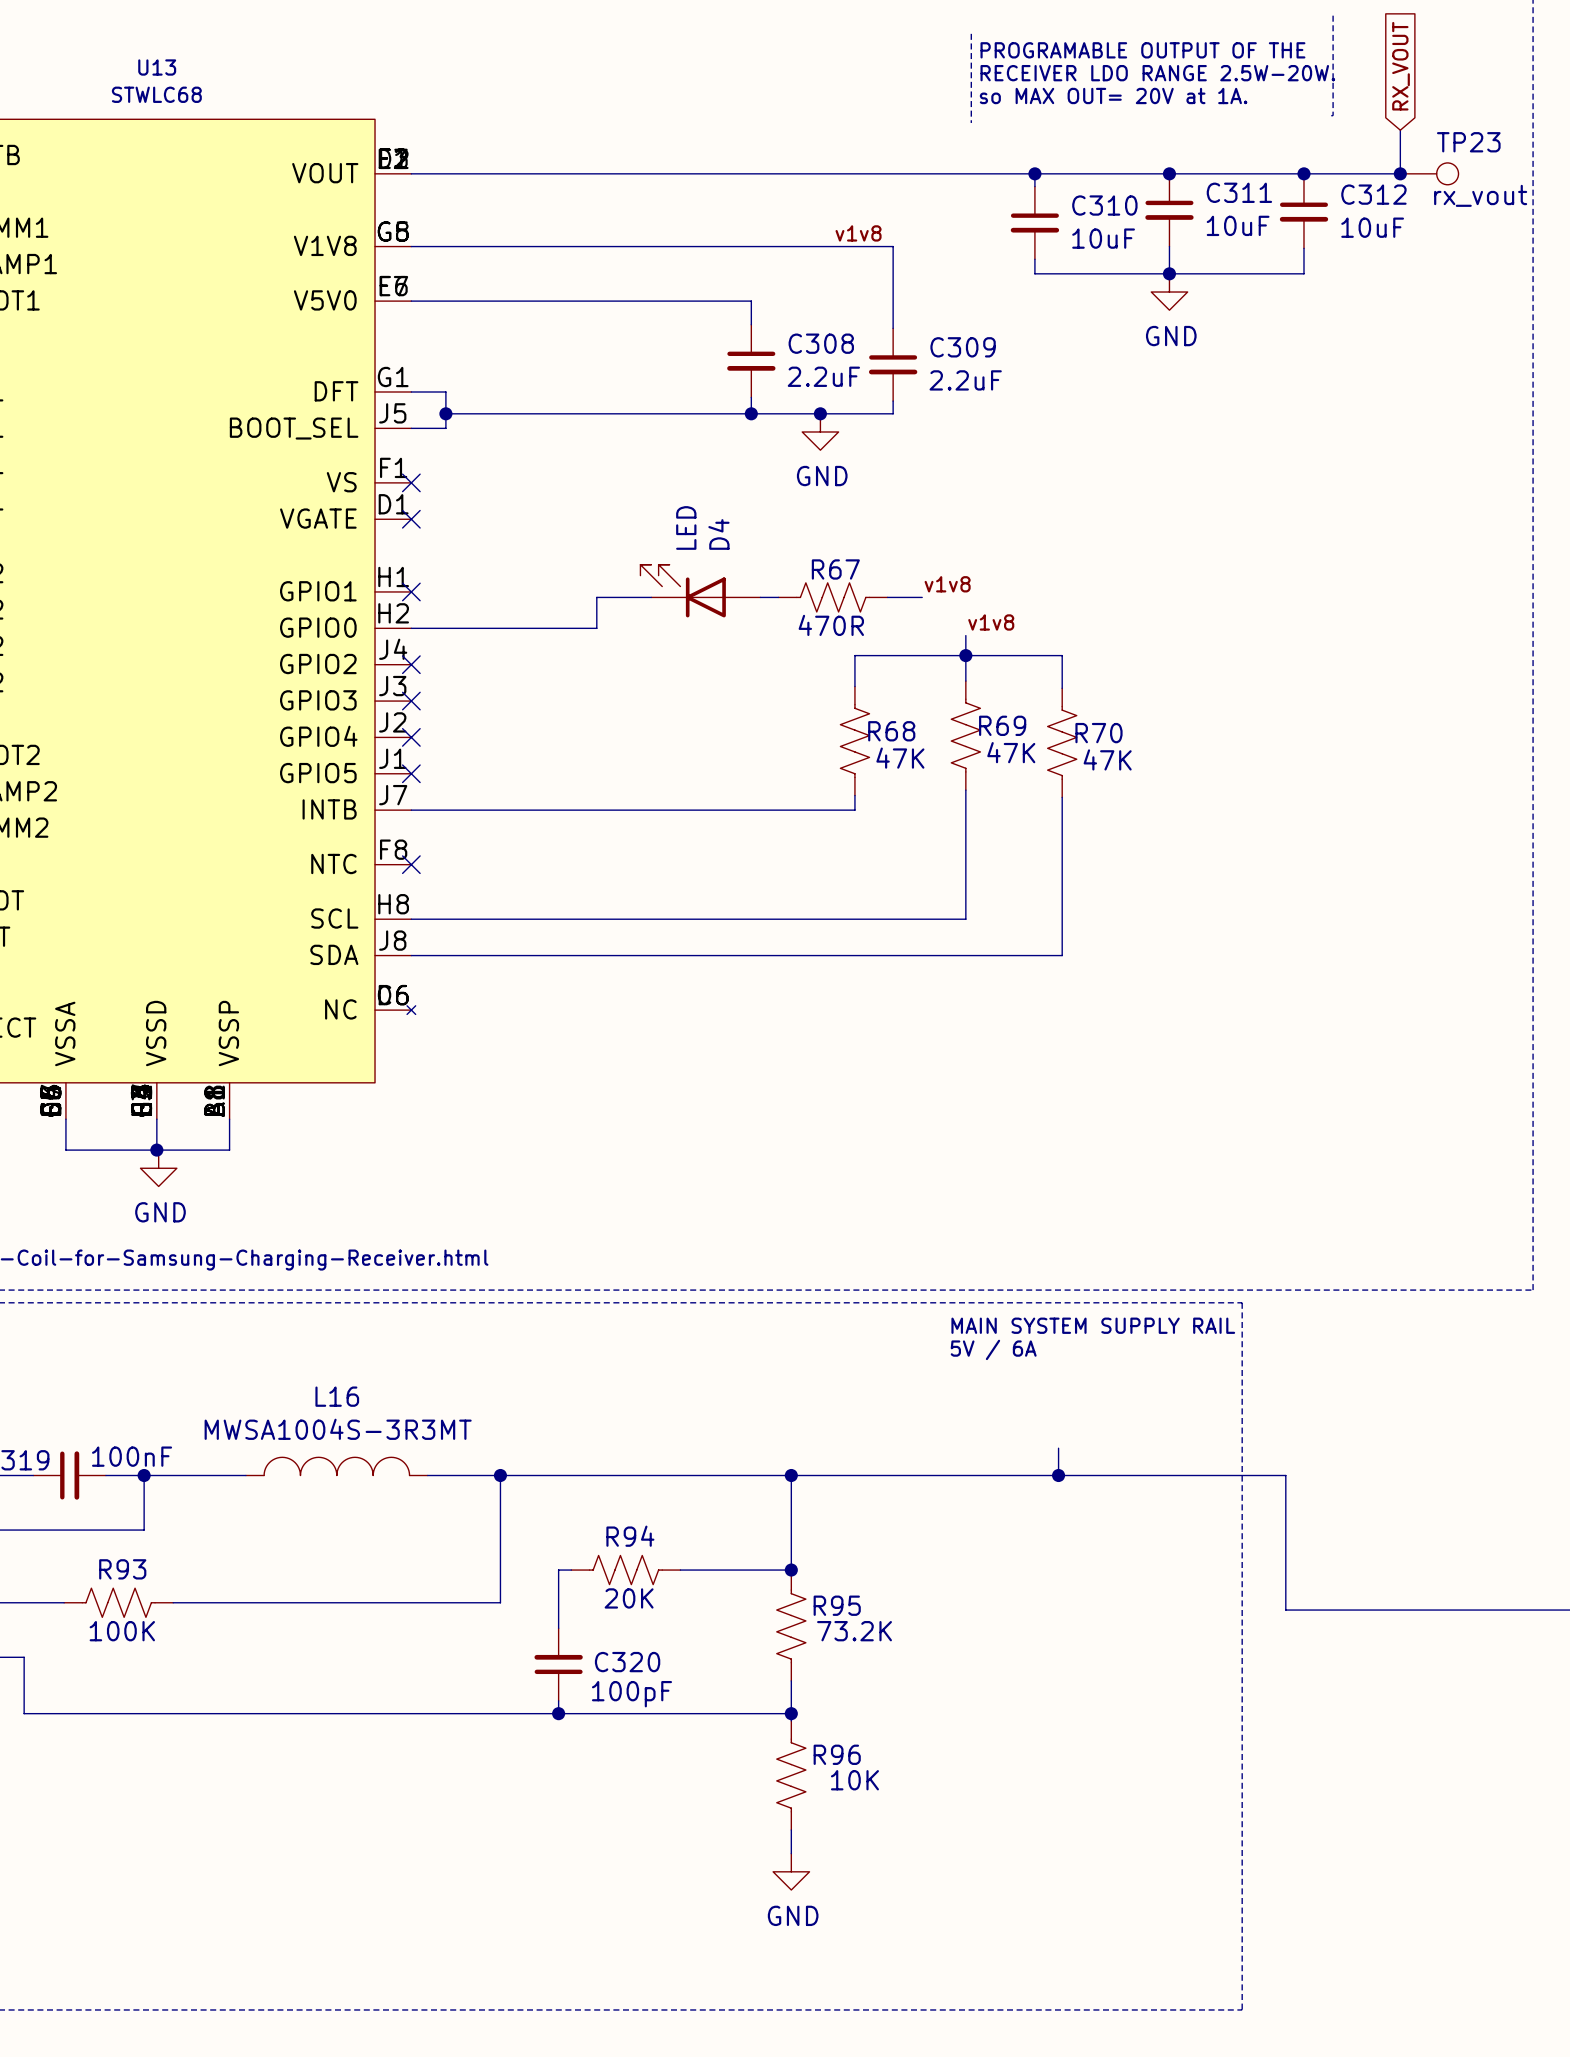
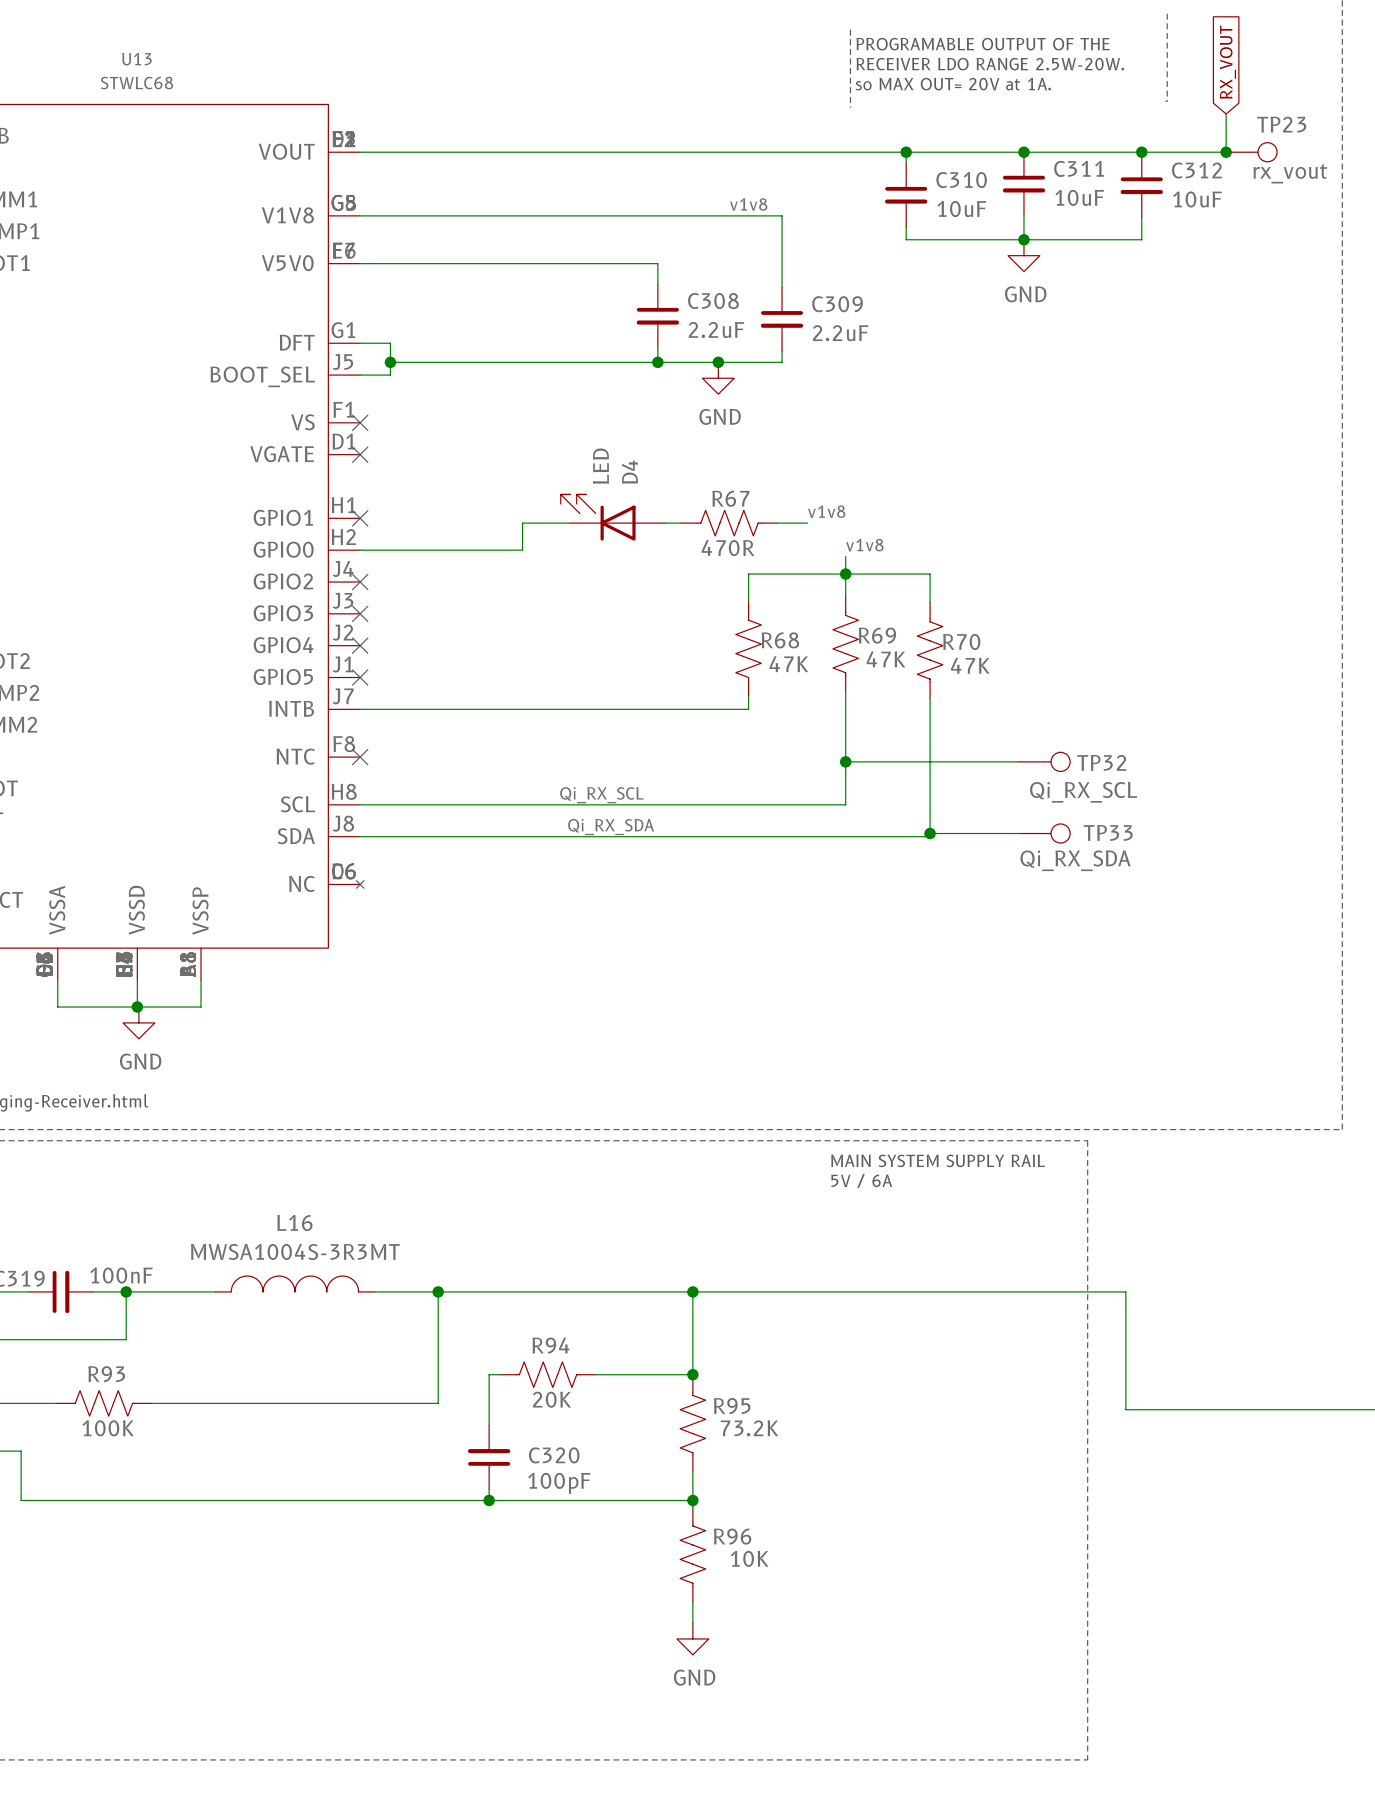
wire: none -> (845, 761) (1019, 761)
junction: none -> (845, 761)
TP32: none -> Qi_RX_SCL (1044, 761)
label: none -> Qi_RX_SCL (601, 795)
label: none -> Qi_RX_SDA (611, 827)
wire: none -> (930, 833) (1019, 833)
junction: none -> (930, 833)
TP33: none -> Qi_RX_SDA (1044, 833)
wire: (1058, 1448) (1058, 1475) -> none
junction: (1058, 1475) -> none

